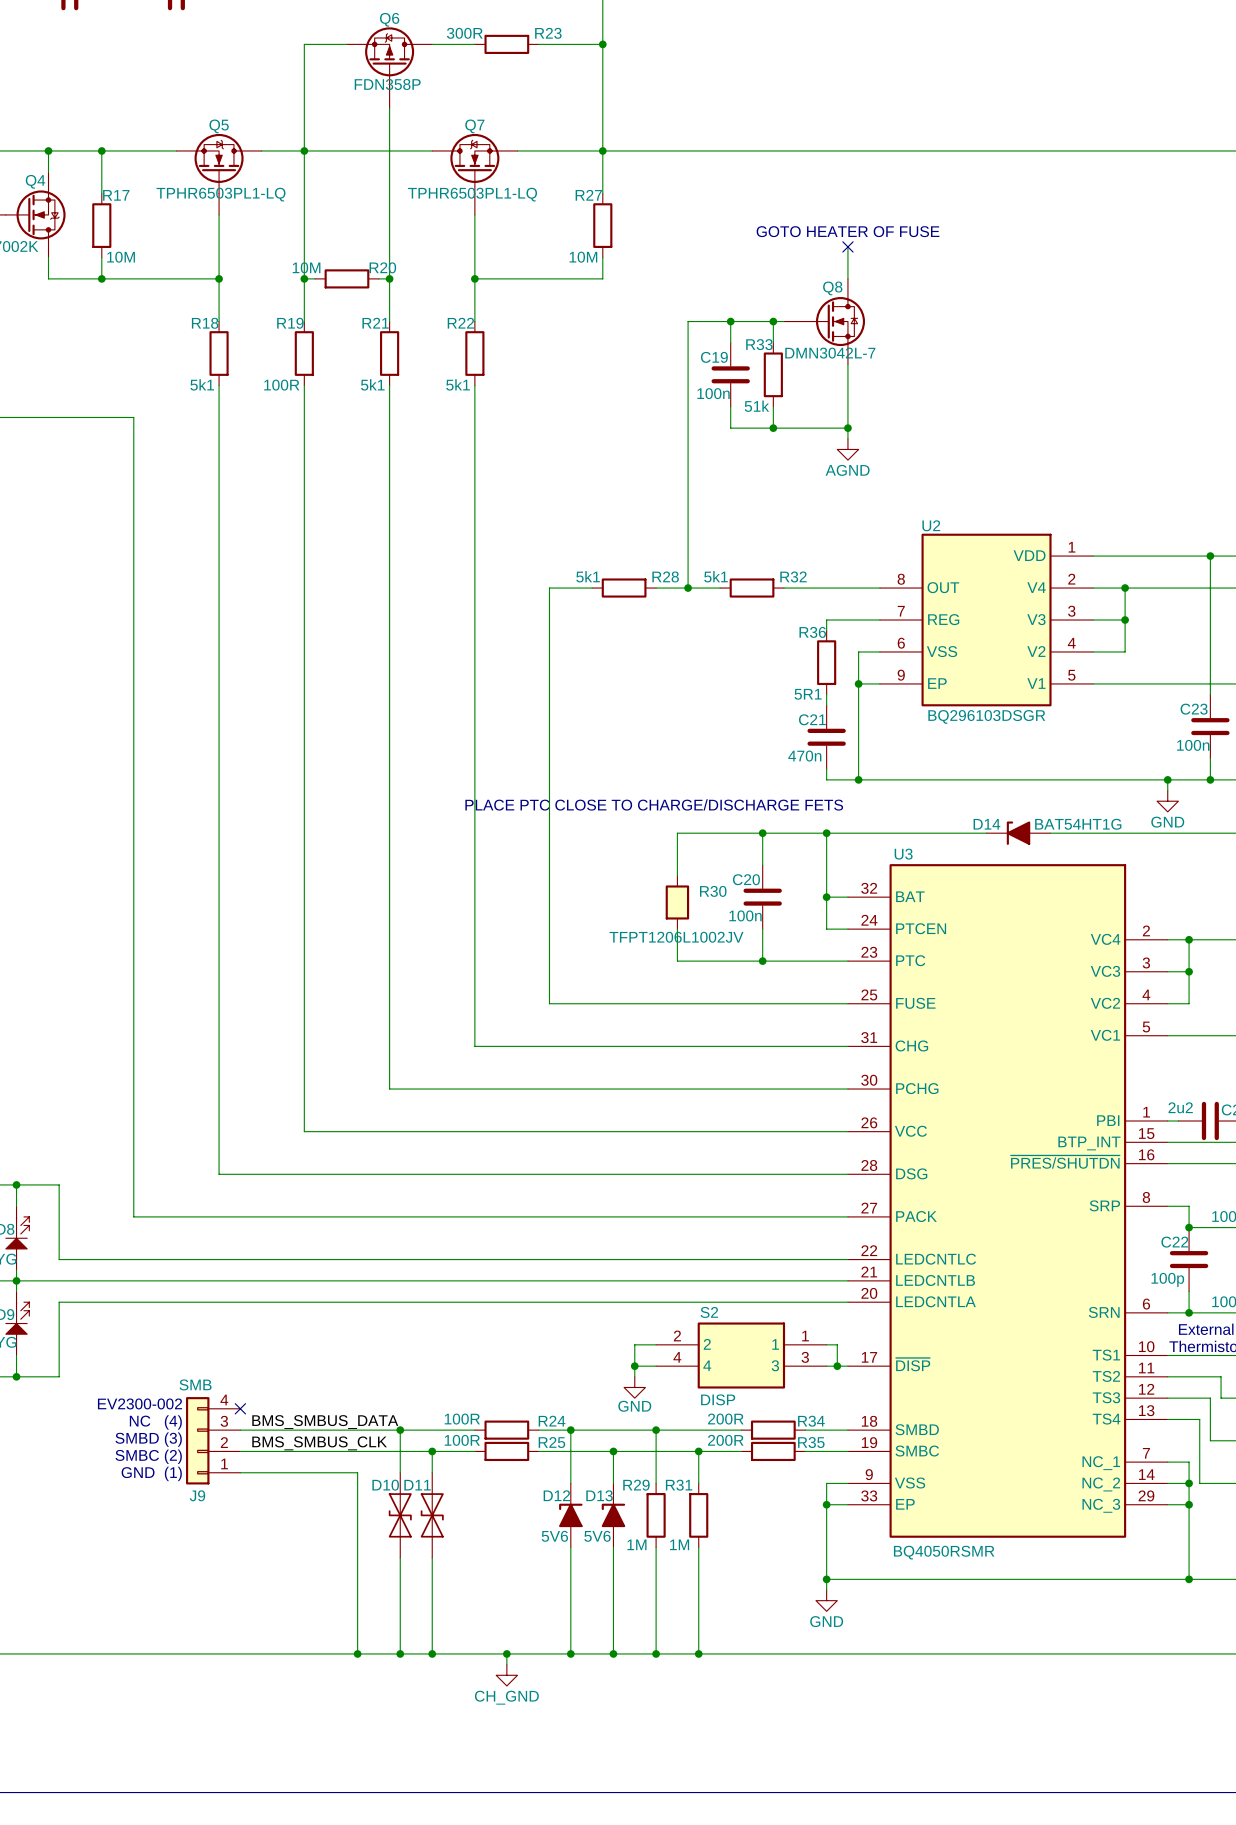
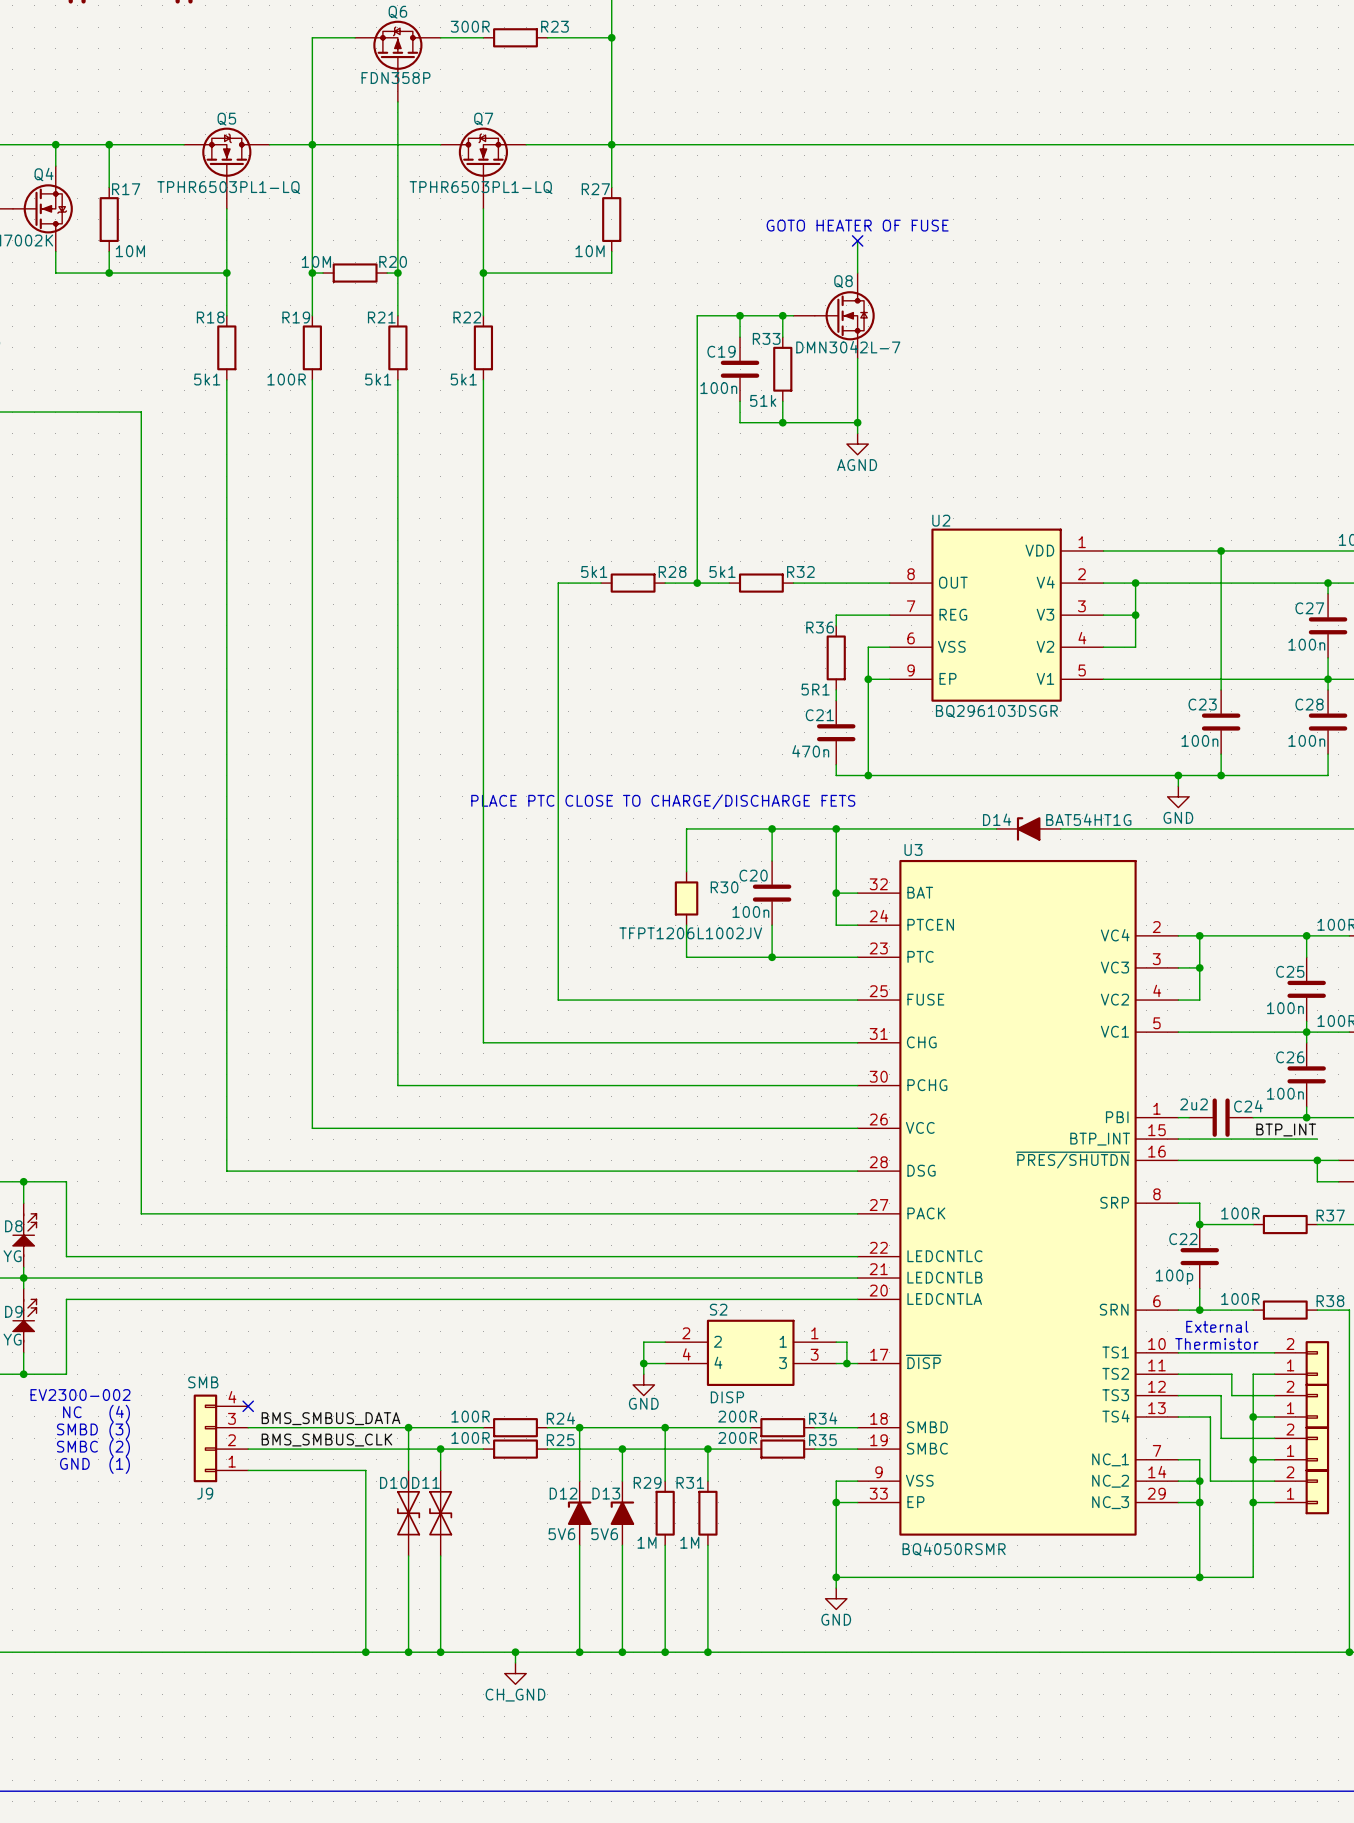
text position: EV2300-002 (139, 1403) -> EV2300-002 (80, 1395)
text position: NC (4) (155, 1422) -> NC (4) (96, 1413)
text position: SMBD (3) (148, 1439) -> SMBD (3) (93, 1430)
text position: SMBC (2) (148, 1456) -> SMBC (2) (93, 1447)
text position: GND (1) (151, 1473) -> GND (1) (94, 1465)

